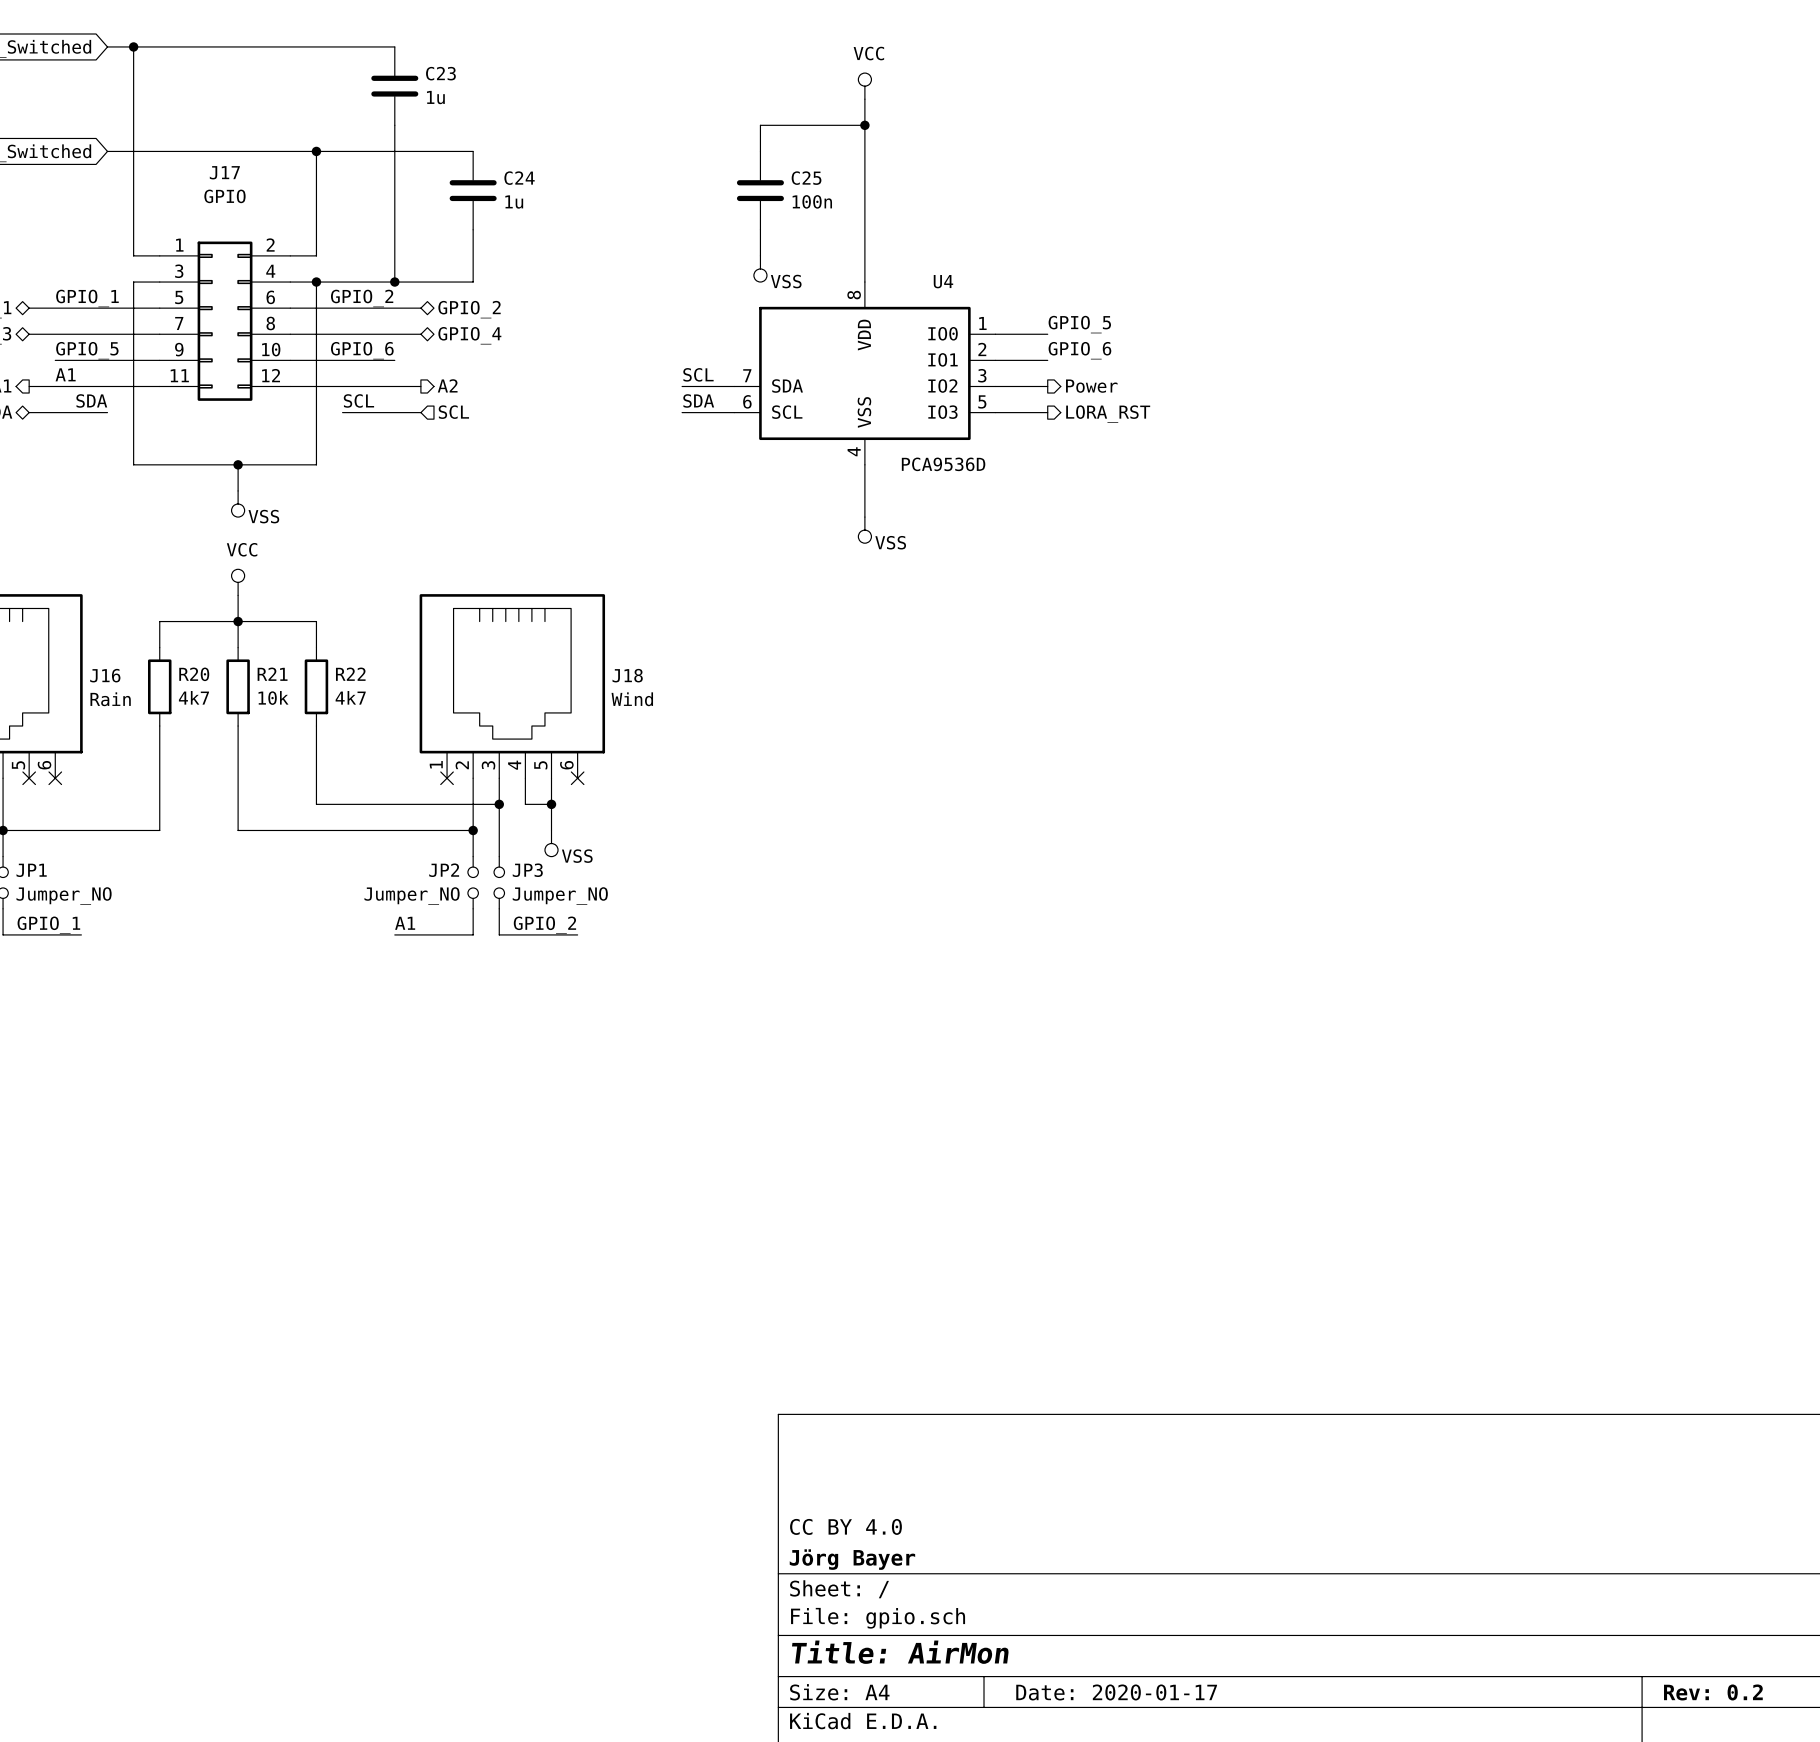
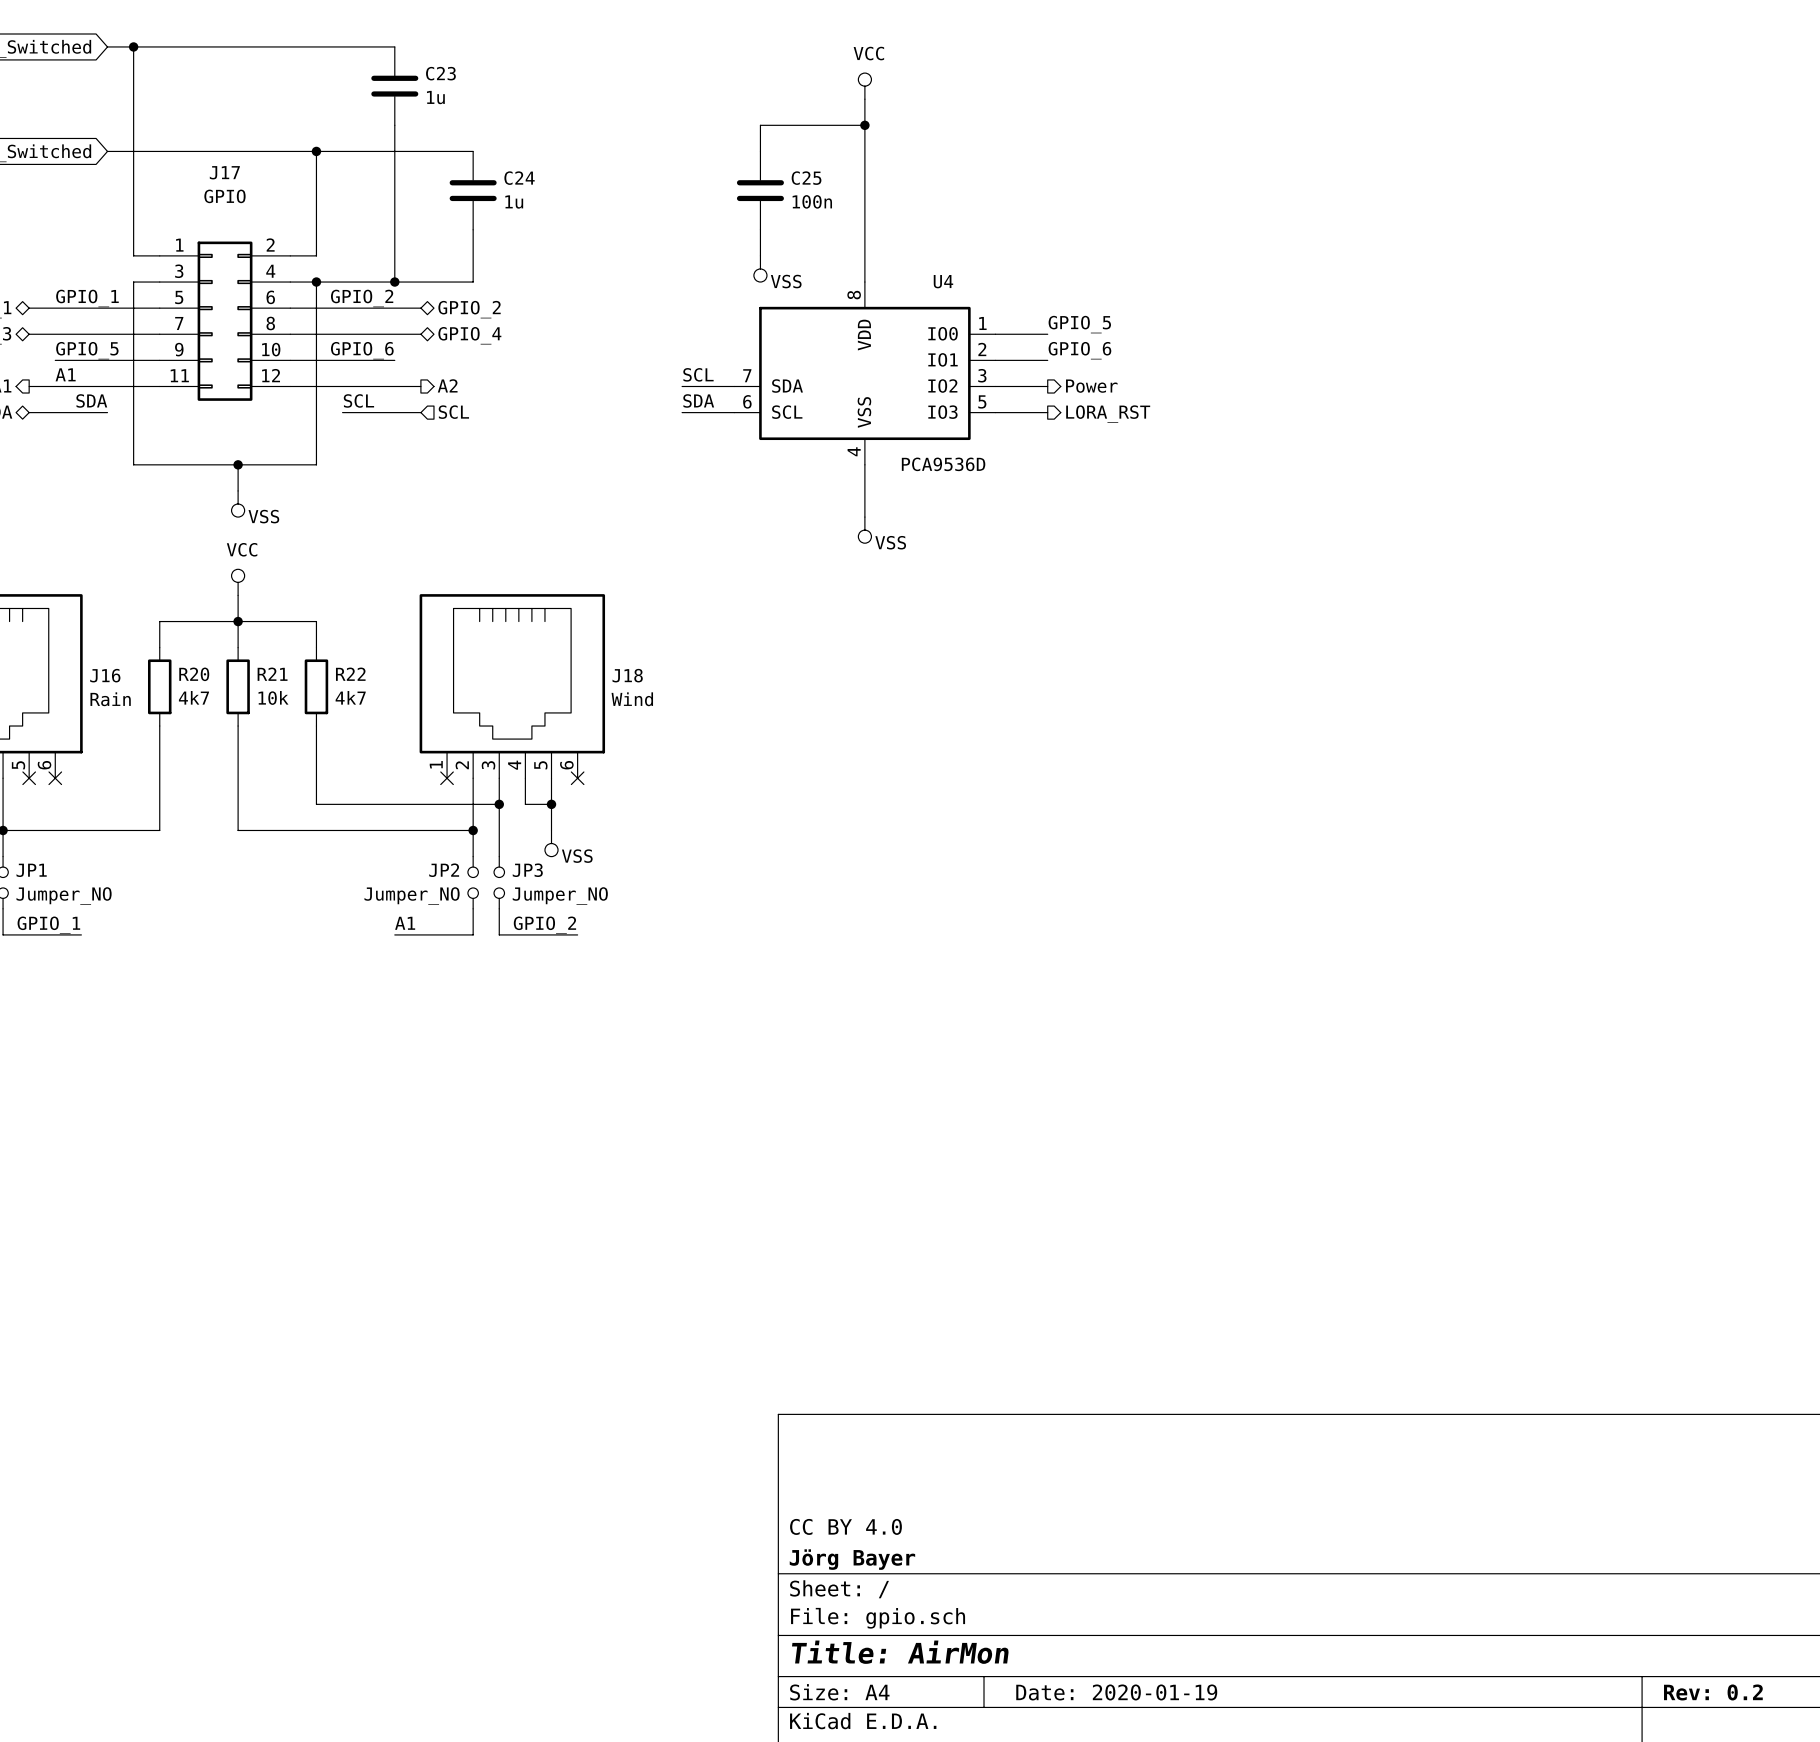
title block: Date: 2020-01-17 (1116, 1692) -> Date: 2020-01-19 (1116, 1692)

